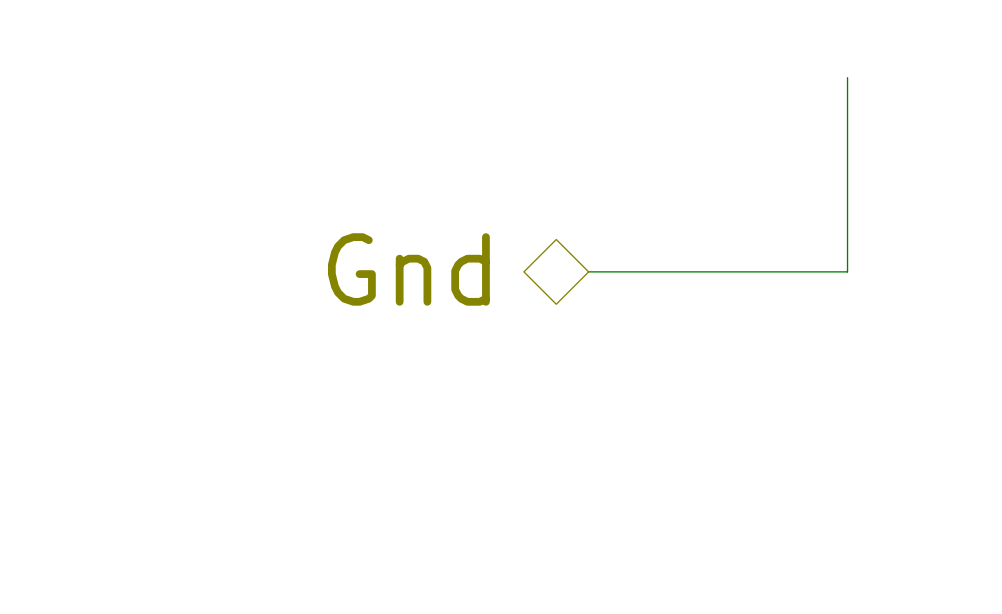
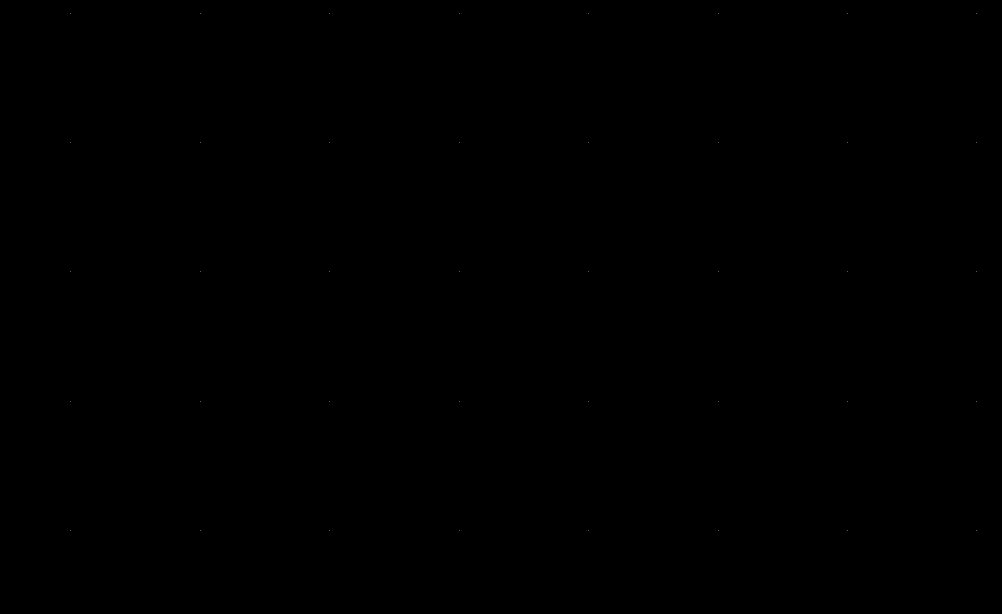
wire: (847, 77) (847, 271) (588, 271) -> none
hierarchical label: Gnd (408, 269) -> none

